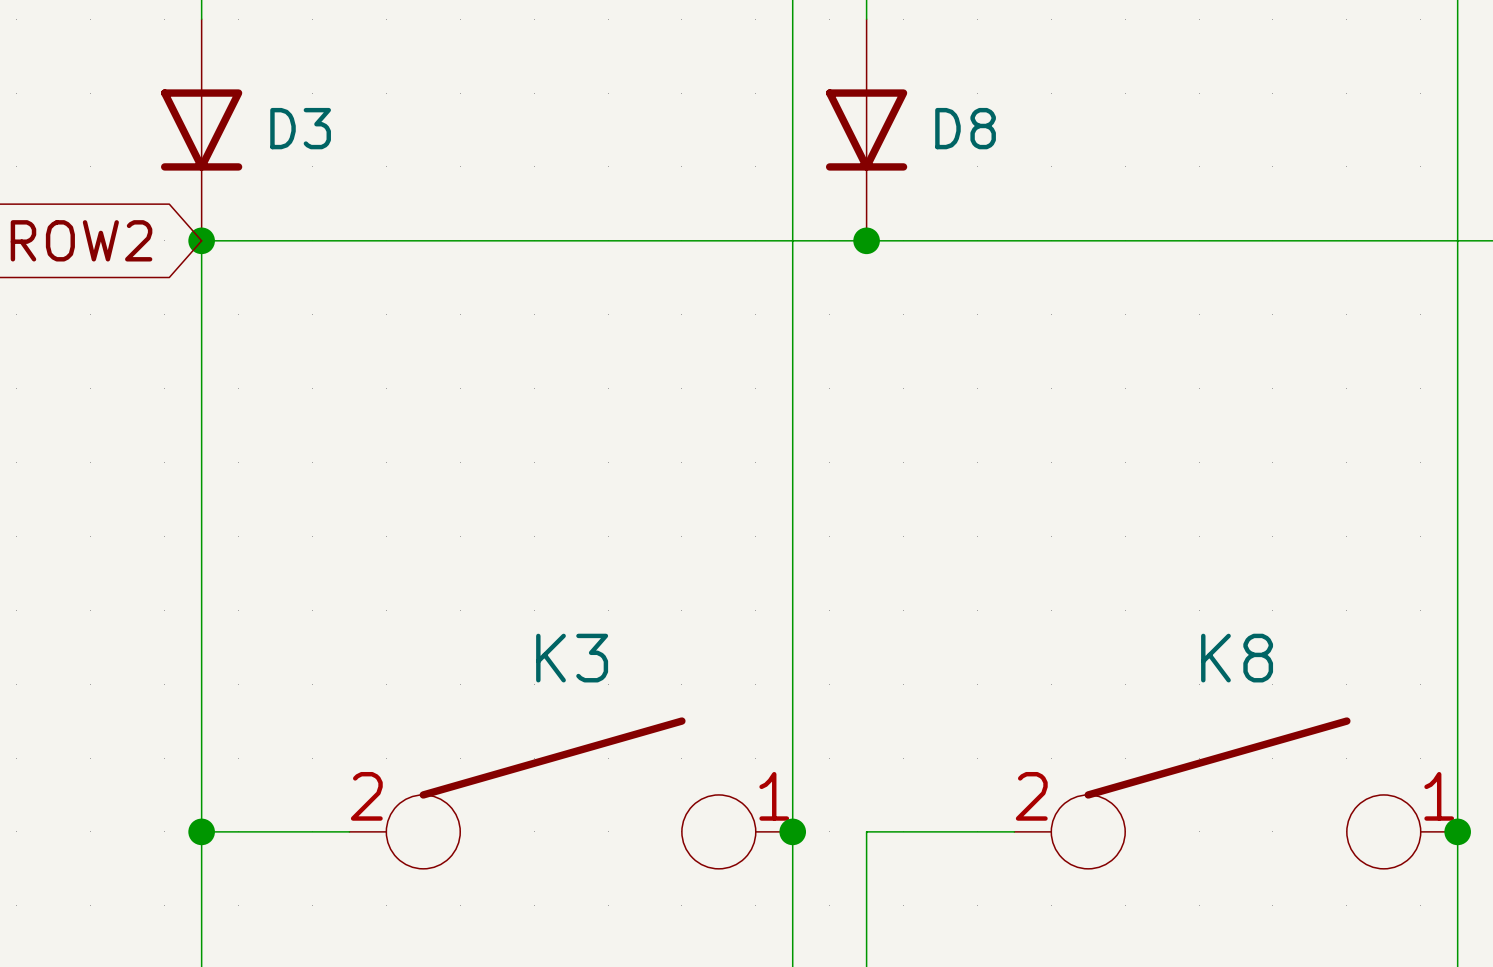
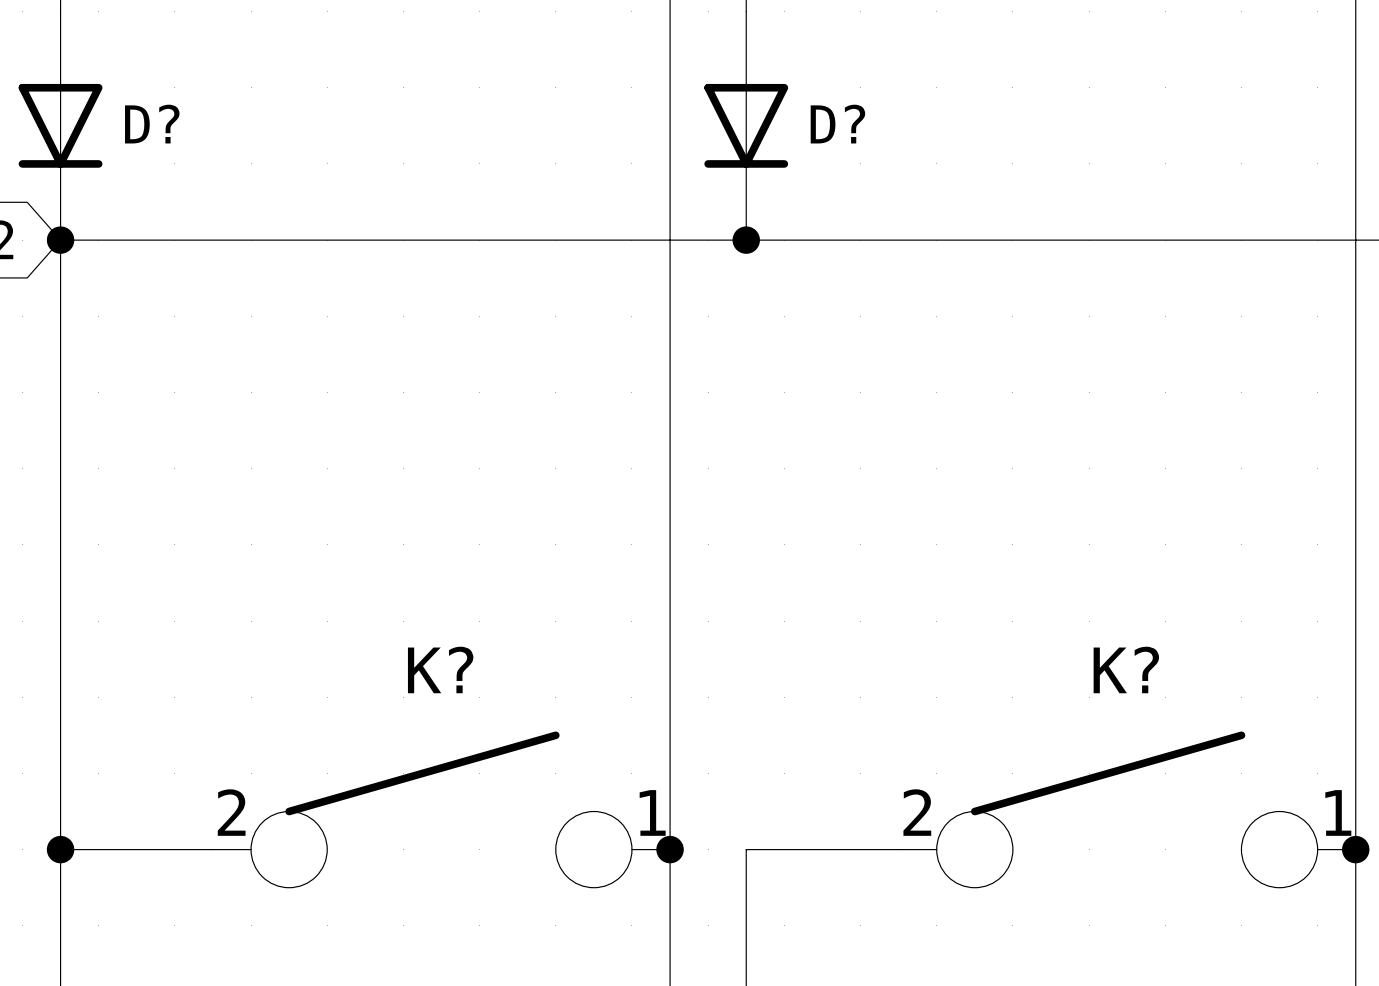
D3 name: D3 (300, 128) -> D? (152, 124)
D8 name: D8 (965, 128) -> D? (837, 124)
K3 name: K3 (572, 658) -> K? (440, 669)
K8 name: K8 (1237, 658) -> K? (1126, 669)

